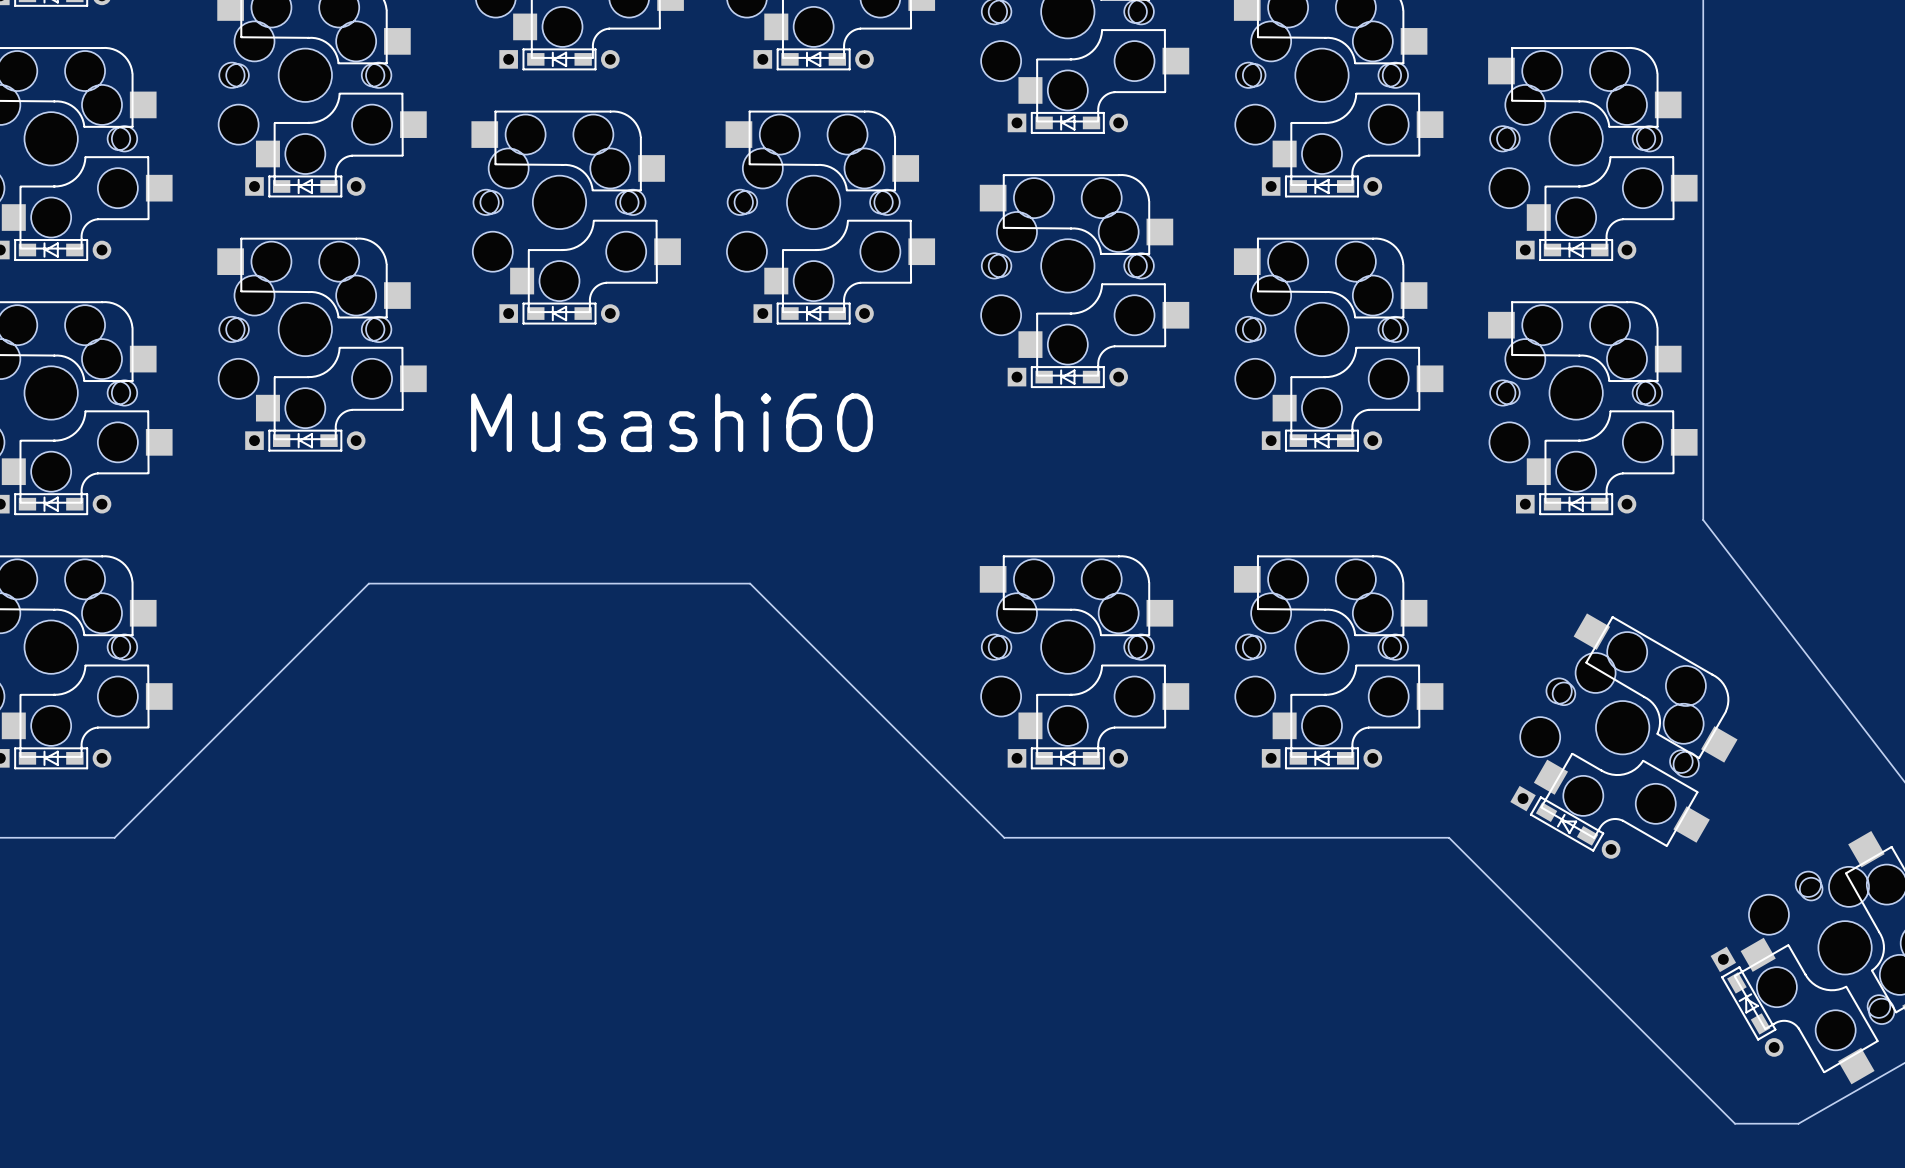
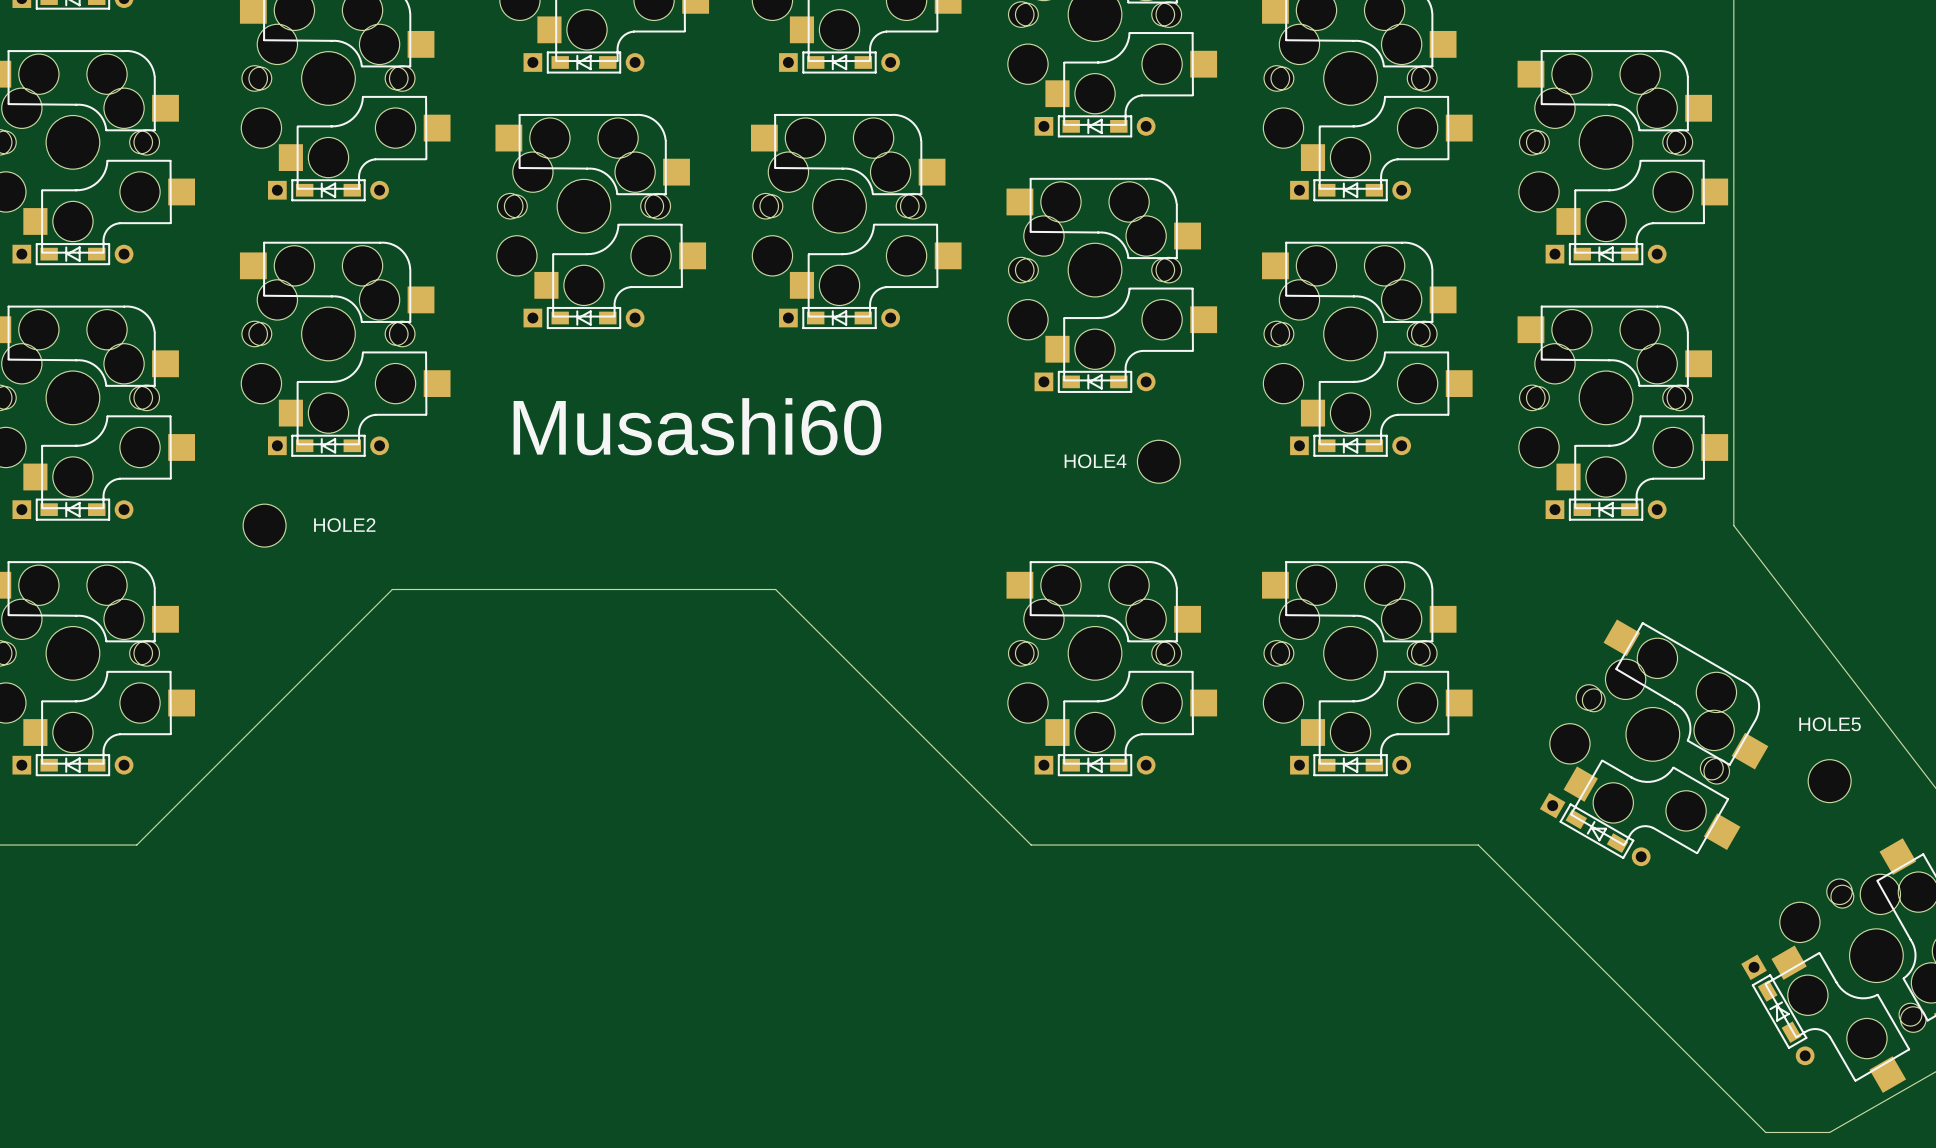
HOLE4: none -> (1158, 461)
HOLE2: none -> (264, 525)
HOLE5: none -> (1829, 781)

